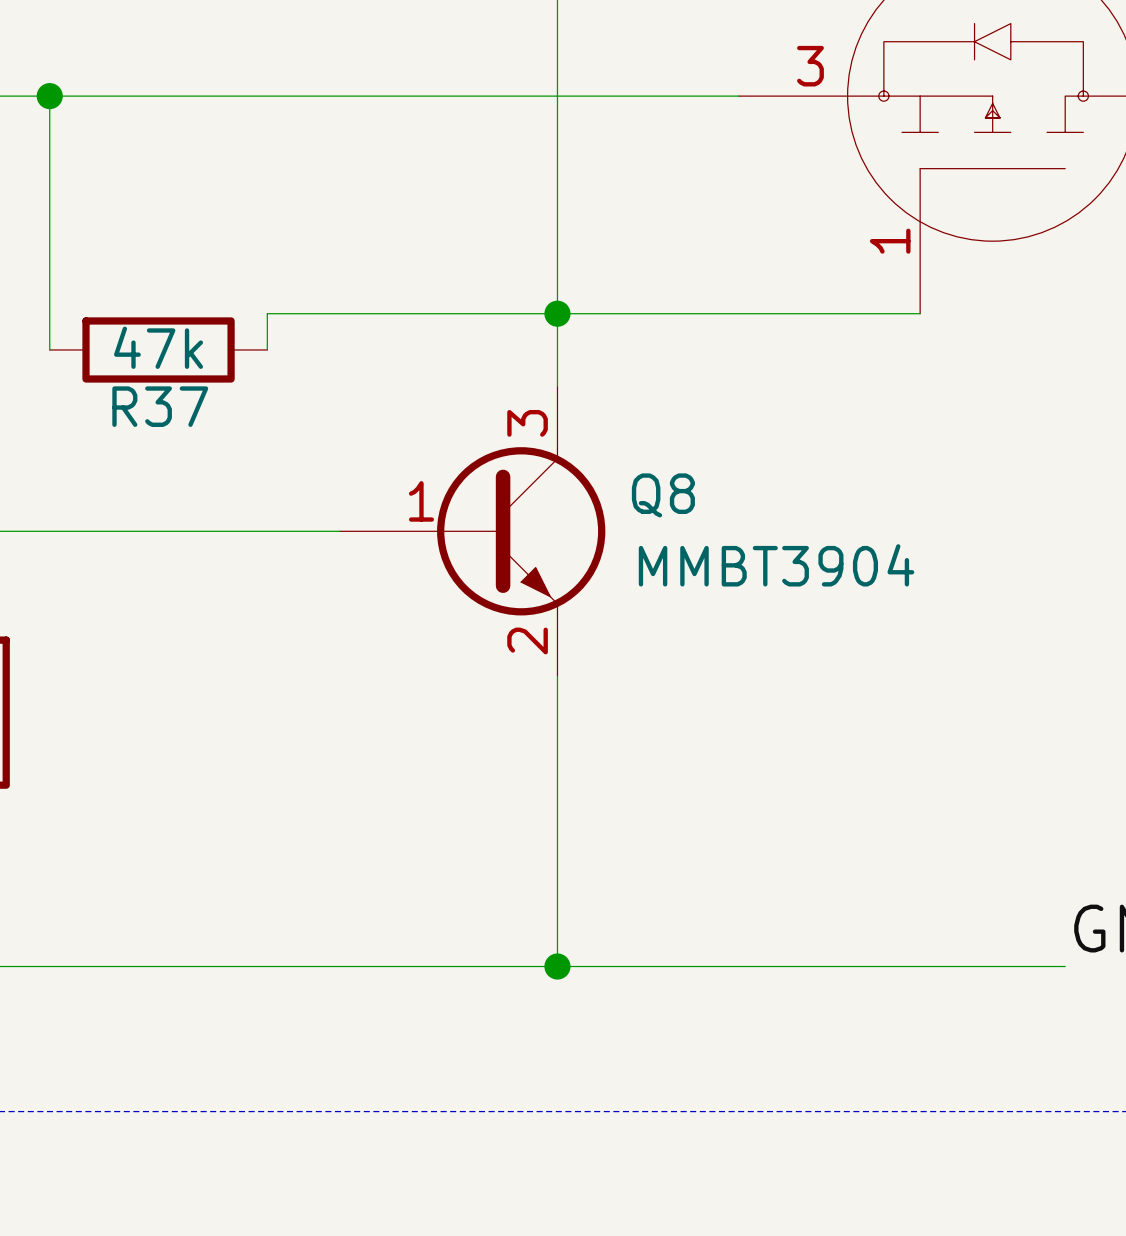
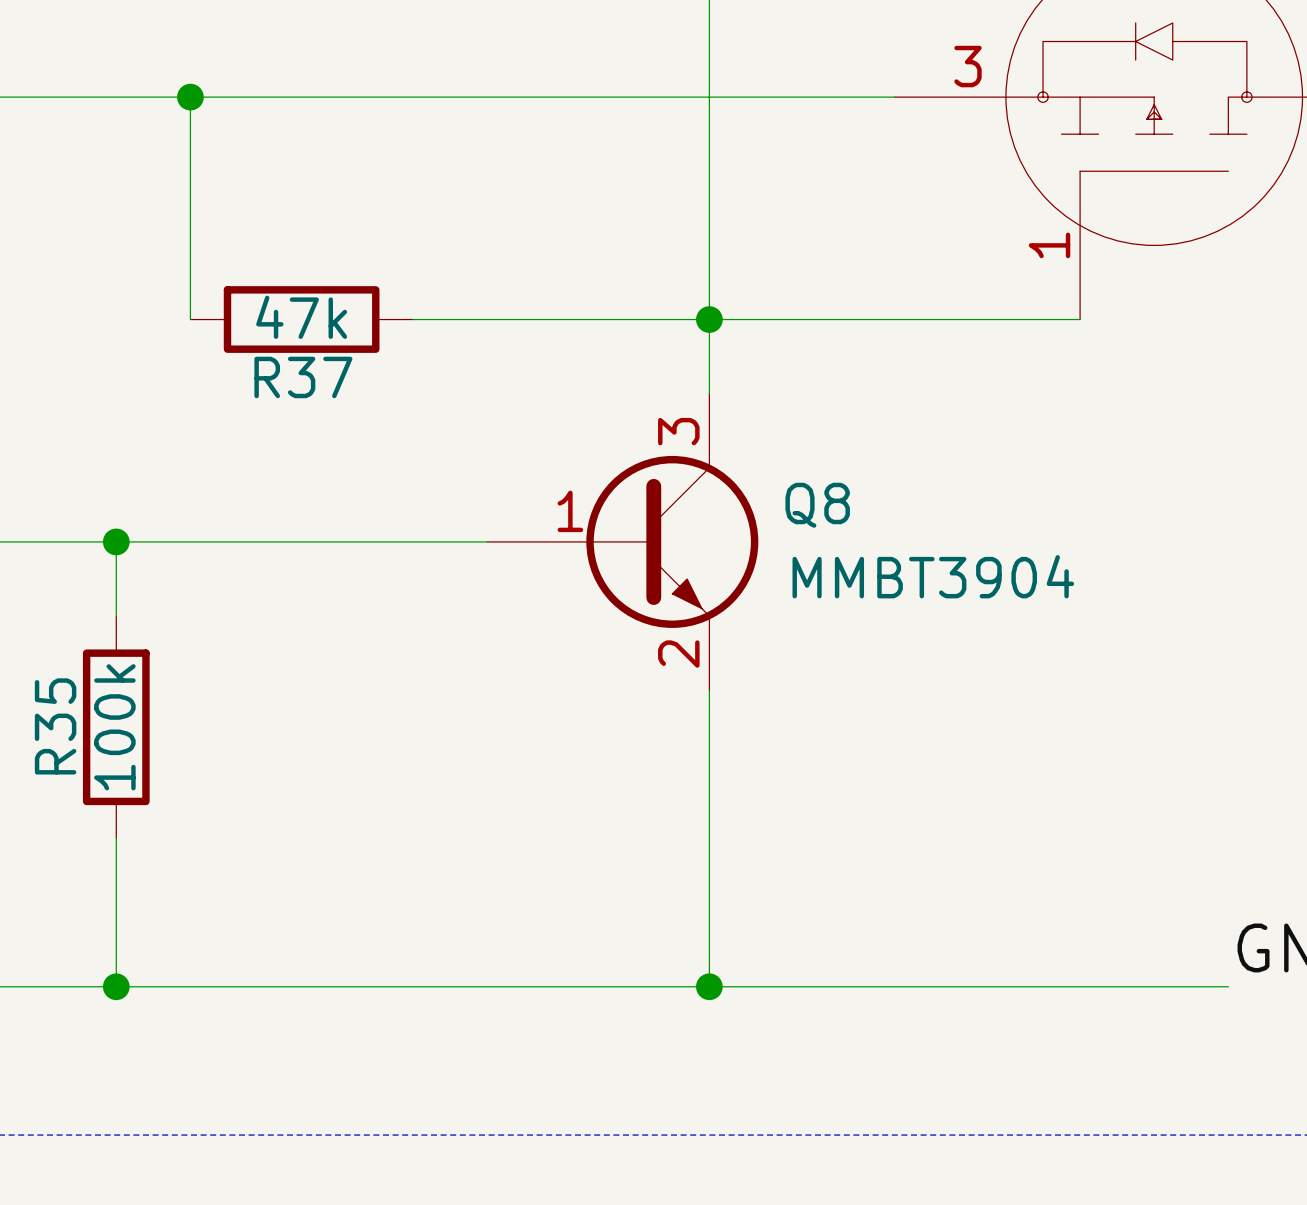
wire: (49, 313) (49, 349) -> none
wire: (267, 313) (267, 349) -> none
R37 position: (158, 349) -> (301, 319)

